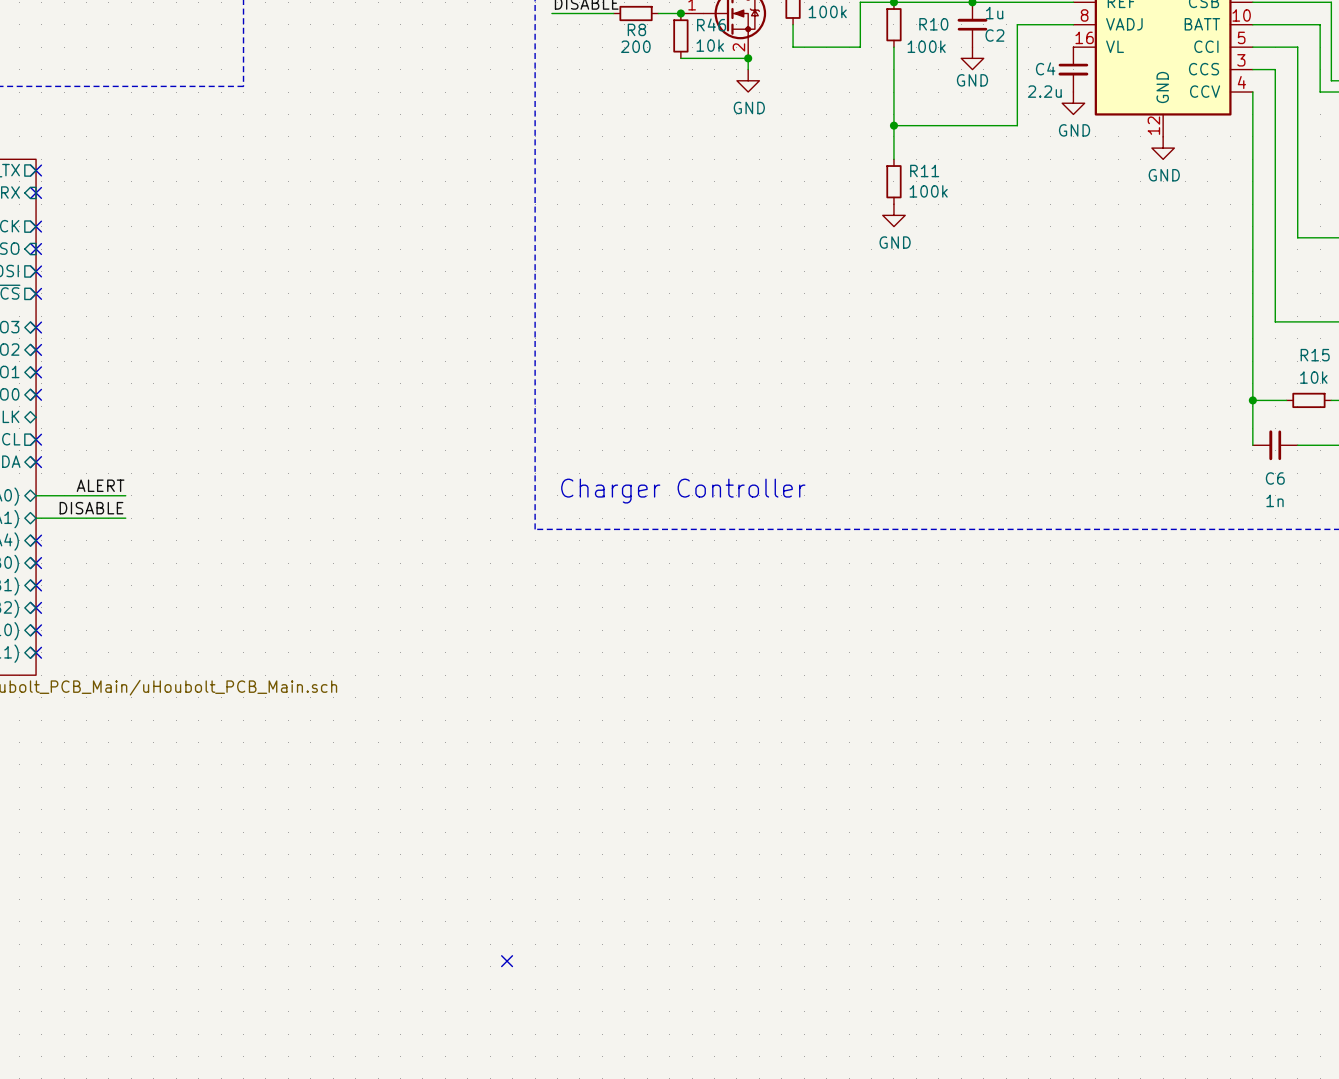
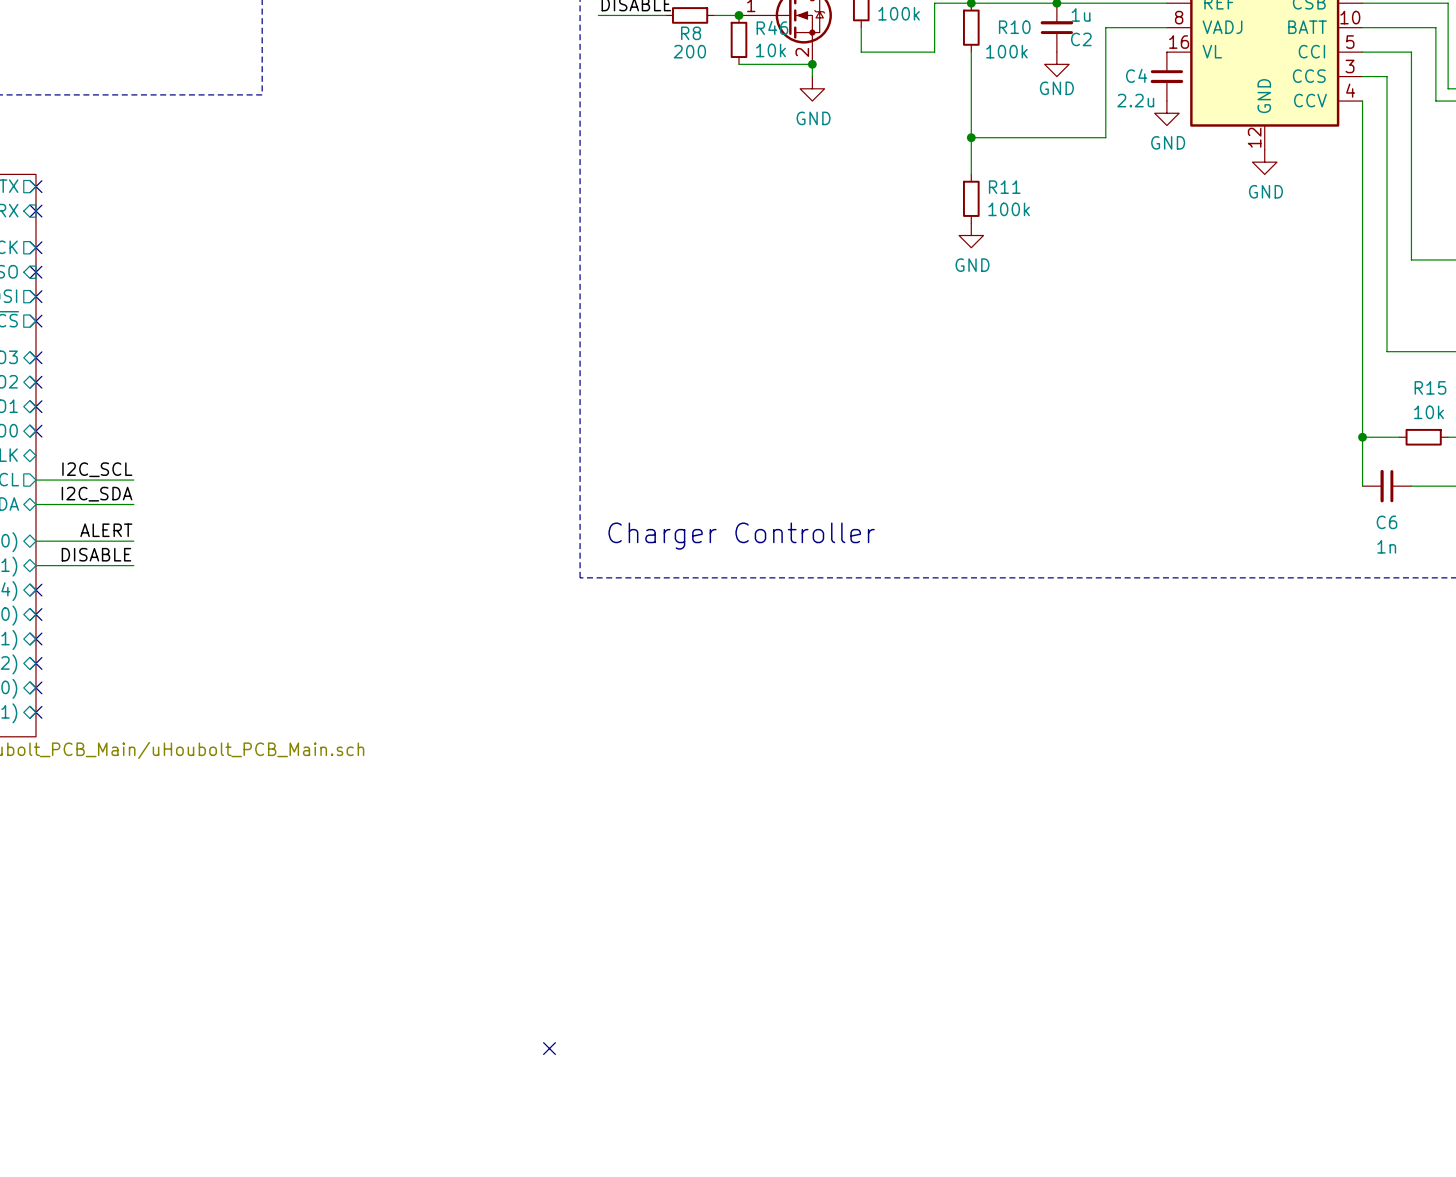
label: none -> I2C_SCL (97, 469)
wire: none -> (35, 480) (133, 480)
no-connect mark: (36, 439) -> none
label: none -> I2C_SDA (97, 494)
wire: none -> (35, 504) (133, 504)
no-connect mark: (36, 462) -> none

